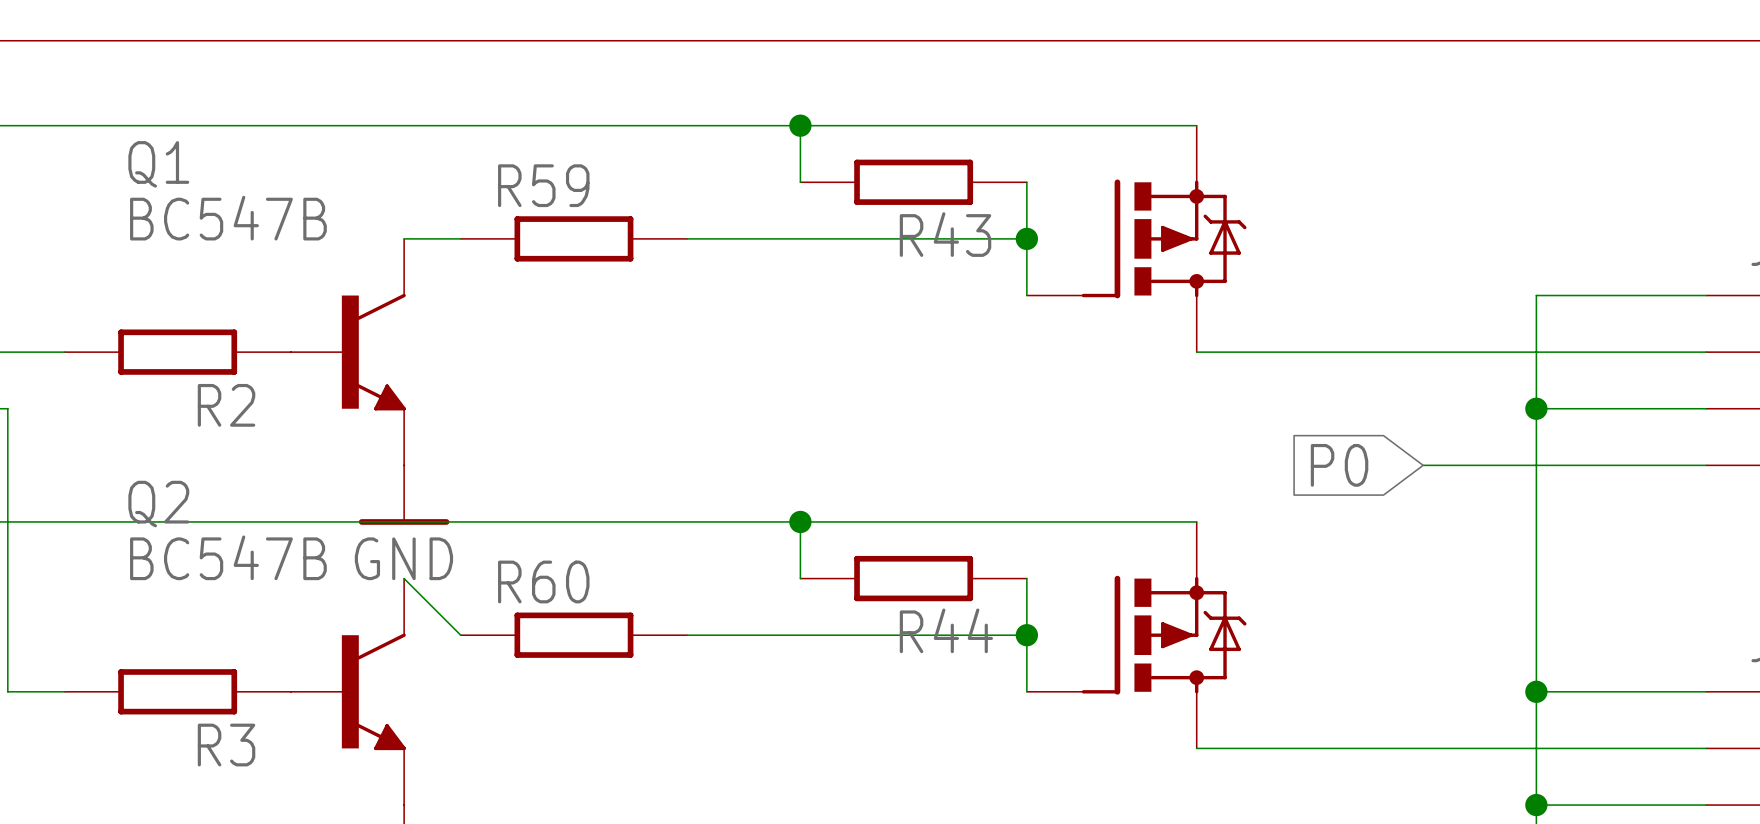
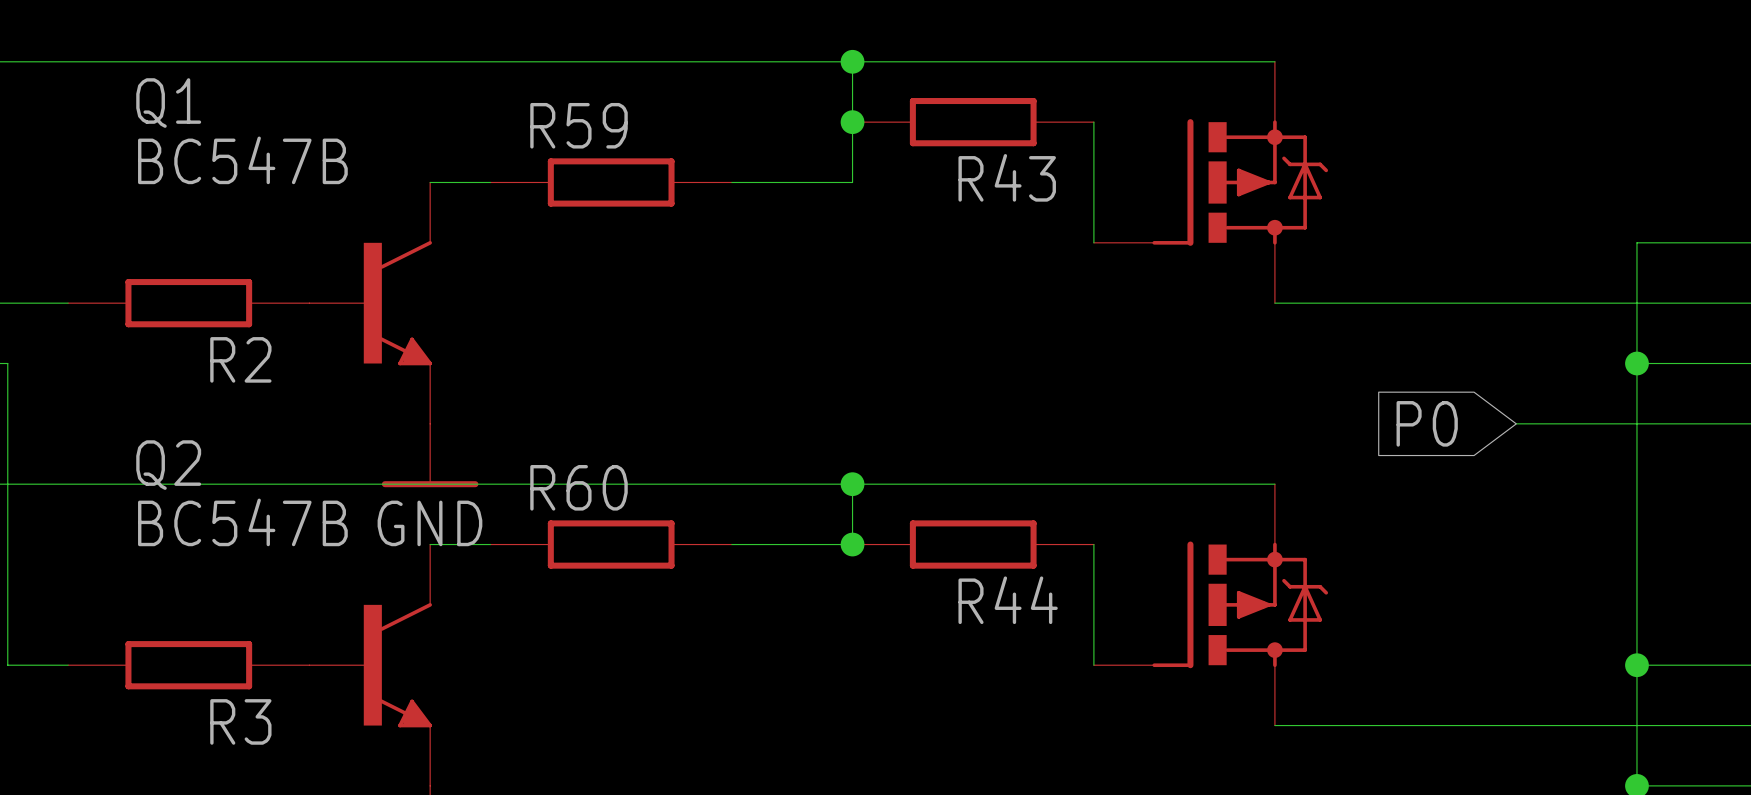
junction: none -> (852, 122)
wire: (800, 238) (1026, 238) -> (852, 182) (852, 122)
junction: (1026, 238) -> none
wire: (404, 578) (460, 635) -> (430, 544) (490, 544)
wire: none -> (731, 544) (852, 544)
junction: none -> (852, 544)
R60 position: (573, 635) -> (611, 544)
wire: (687, 635) (1026, 635) -> none
junction: (1026, 635) -> none

